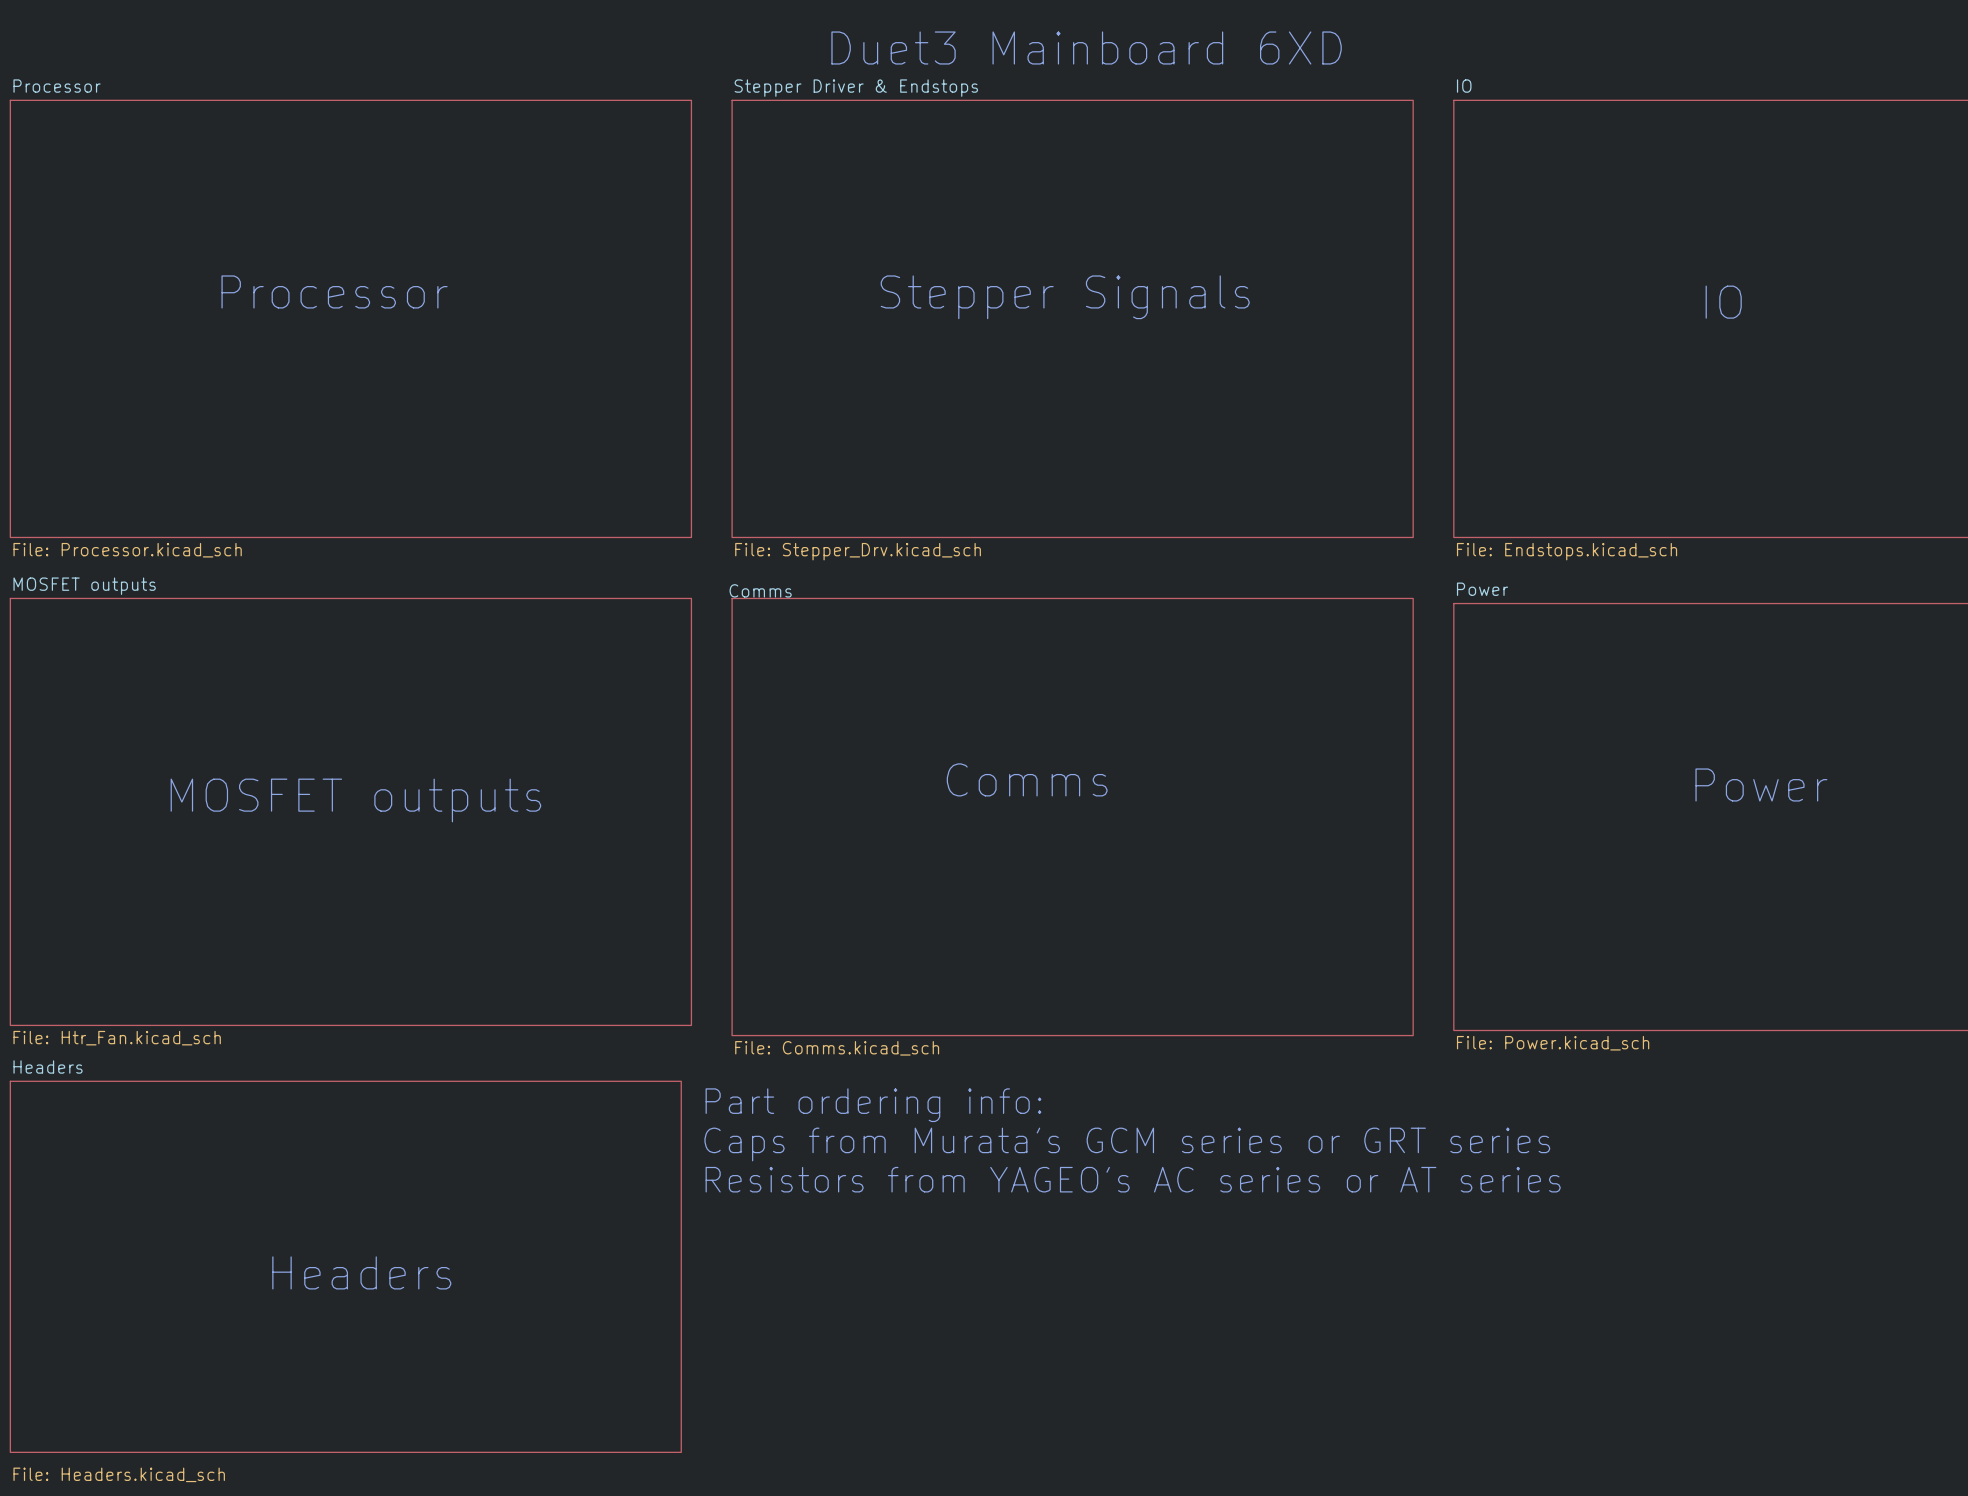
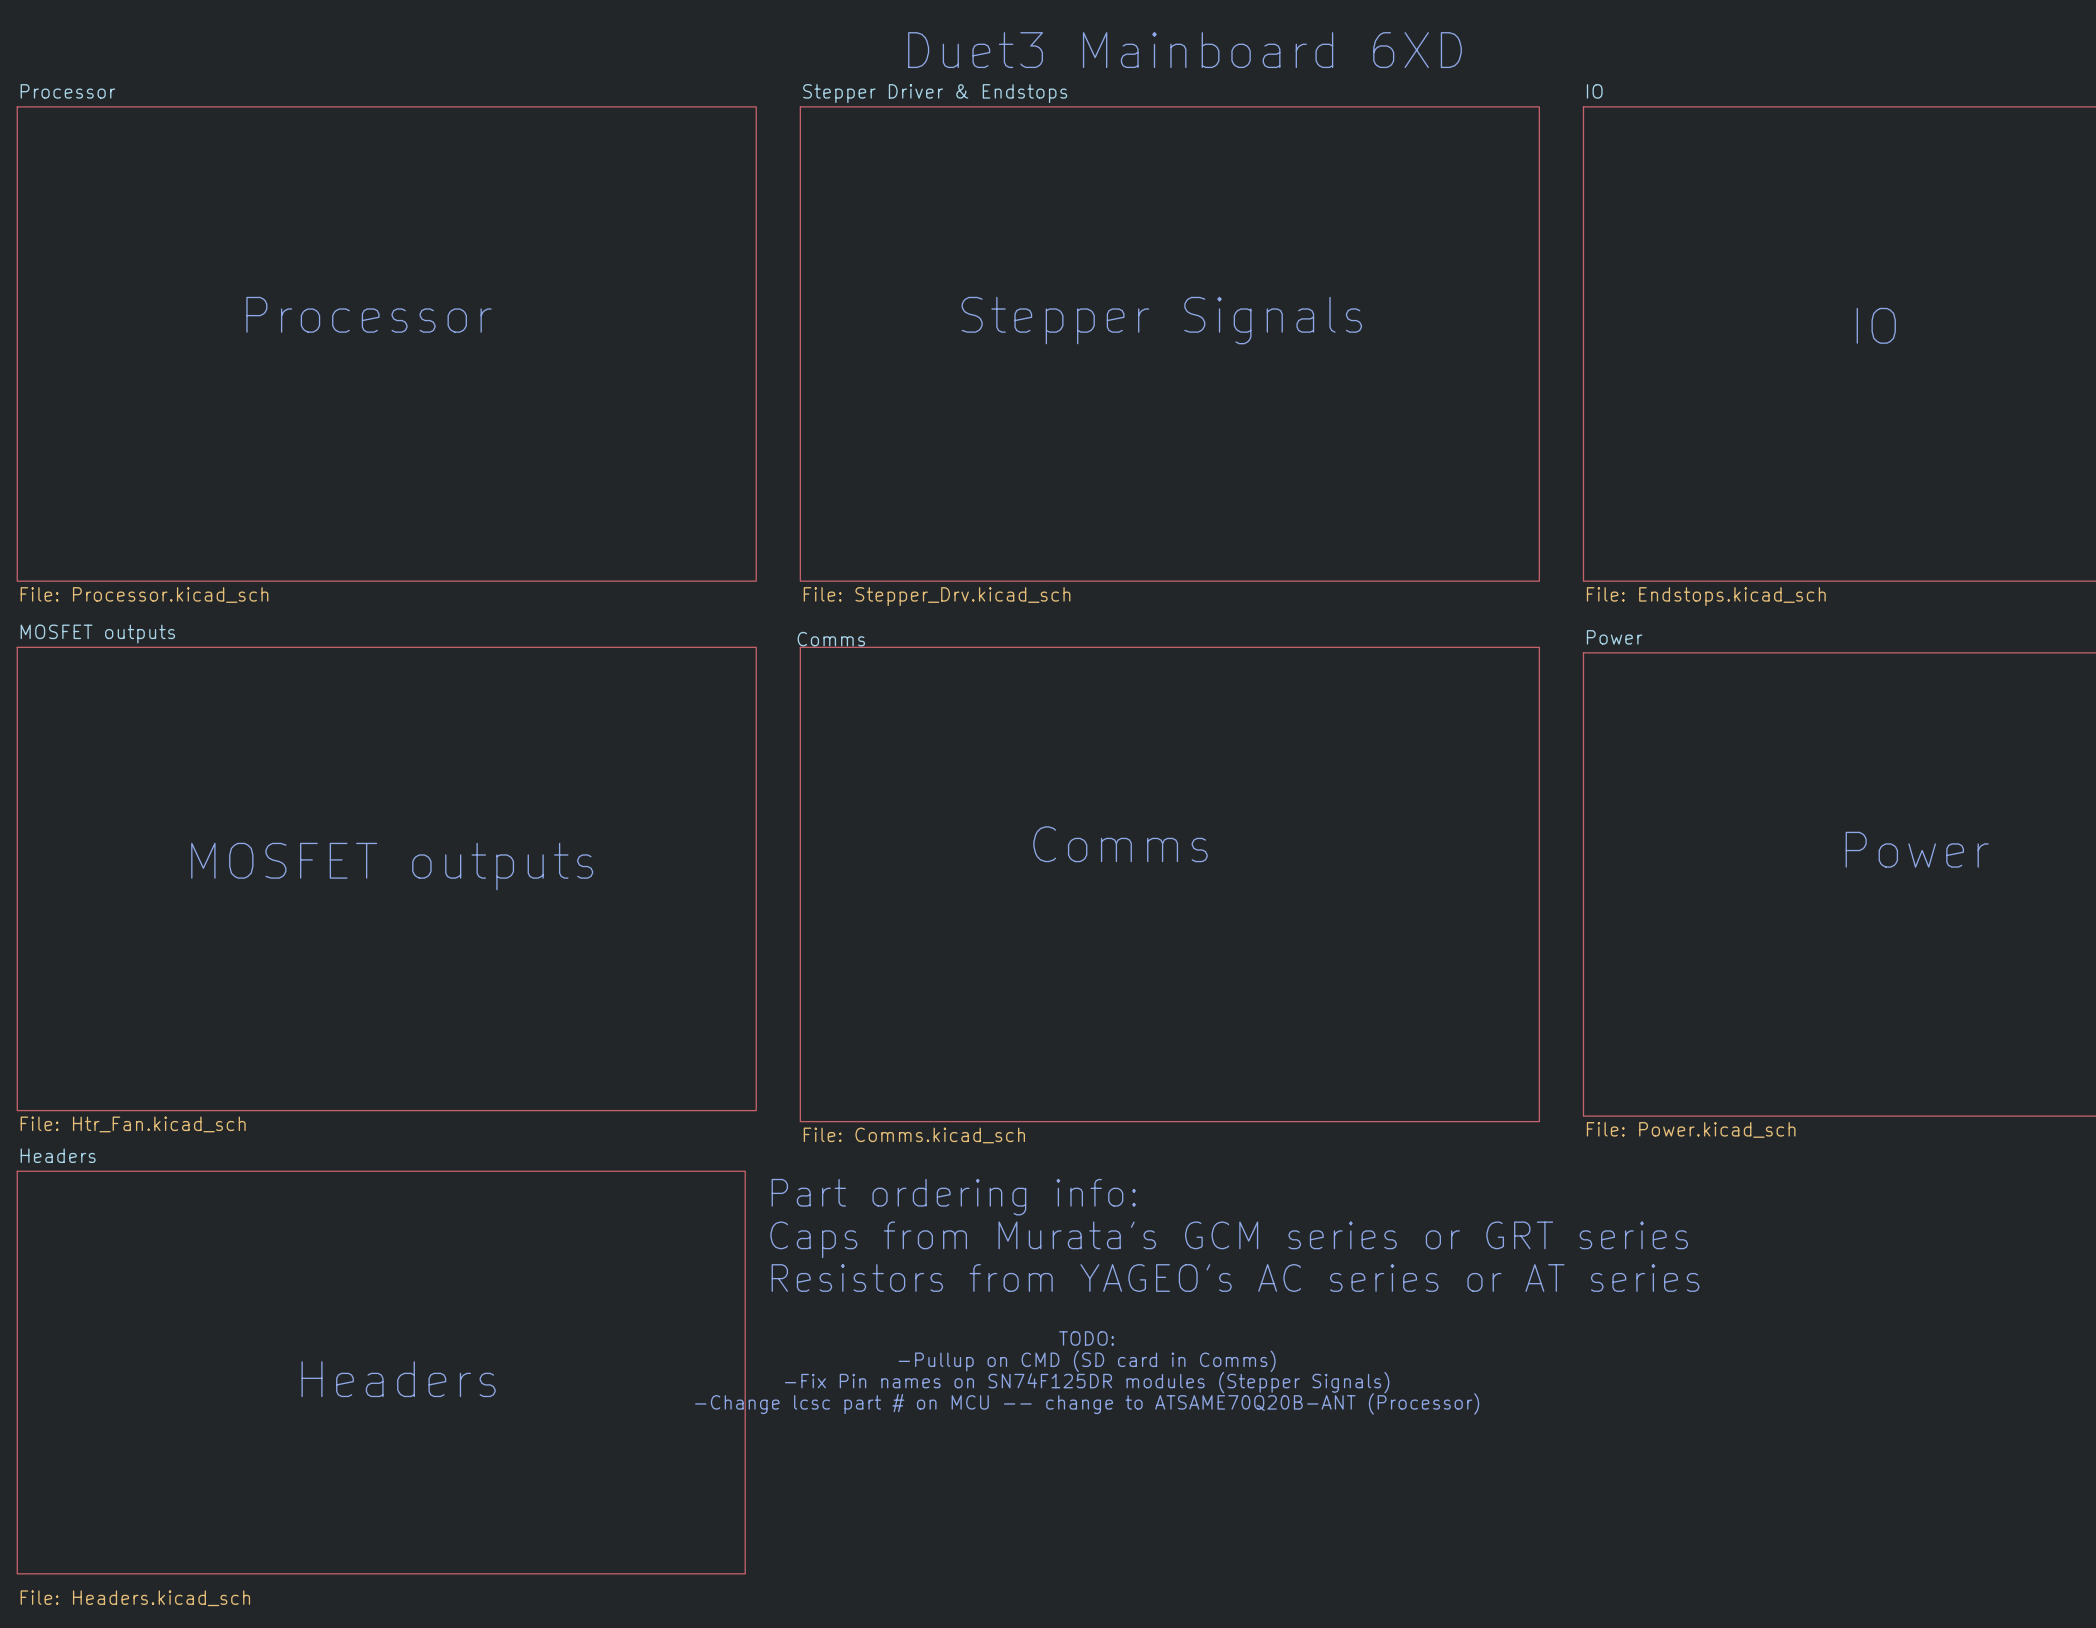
text: none -> TODO: (1086, 1338)
text: none -> -Pullup on CMD (SD card in Comms) (1087, 1361)
text: none -> -Fix Pin names on SN74F125DR modules (Stepper Signals) (1087, 1382)
text: none -> -Change lcsc part # on MCU -- change to ATSAME70Q20B-ANT (Processor) (1087, 1403)

